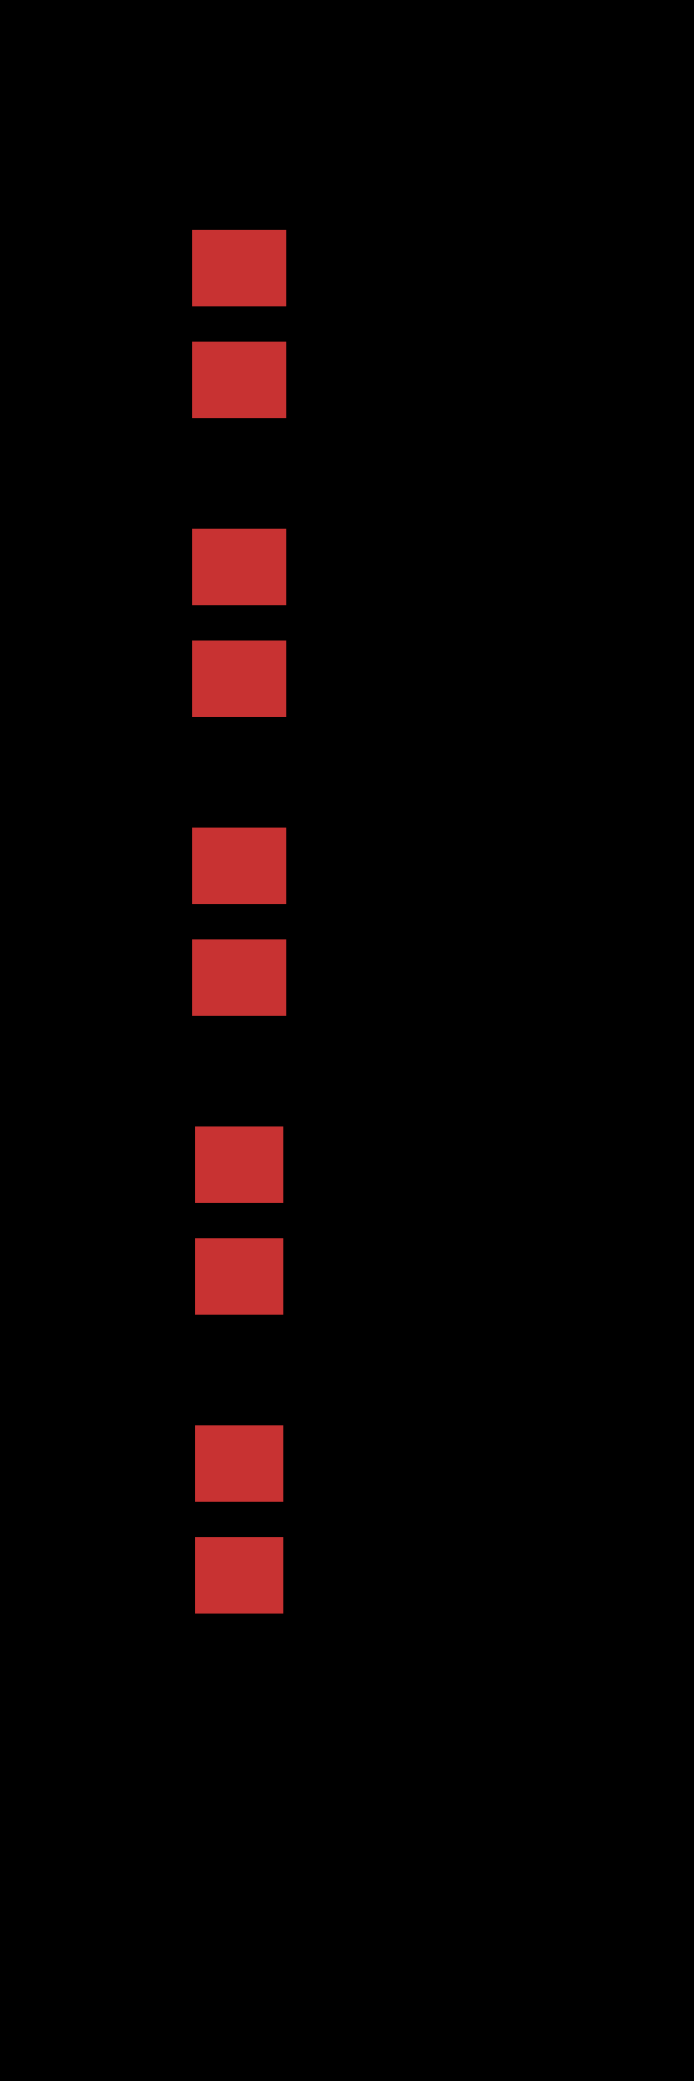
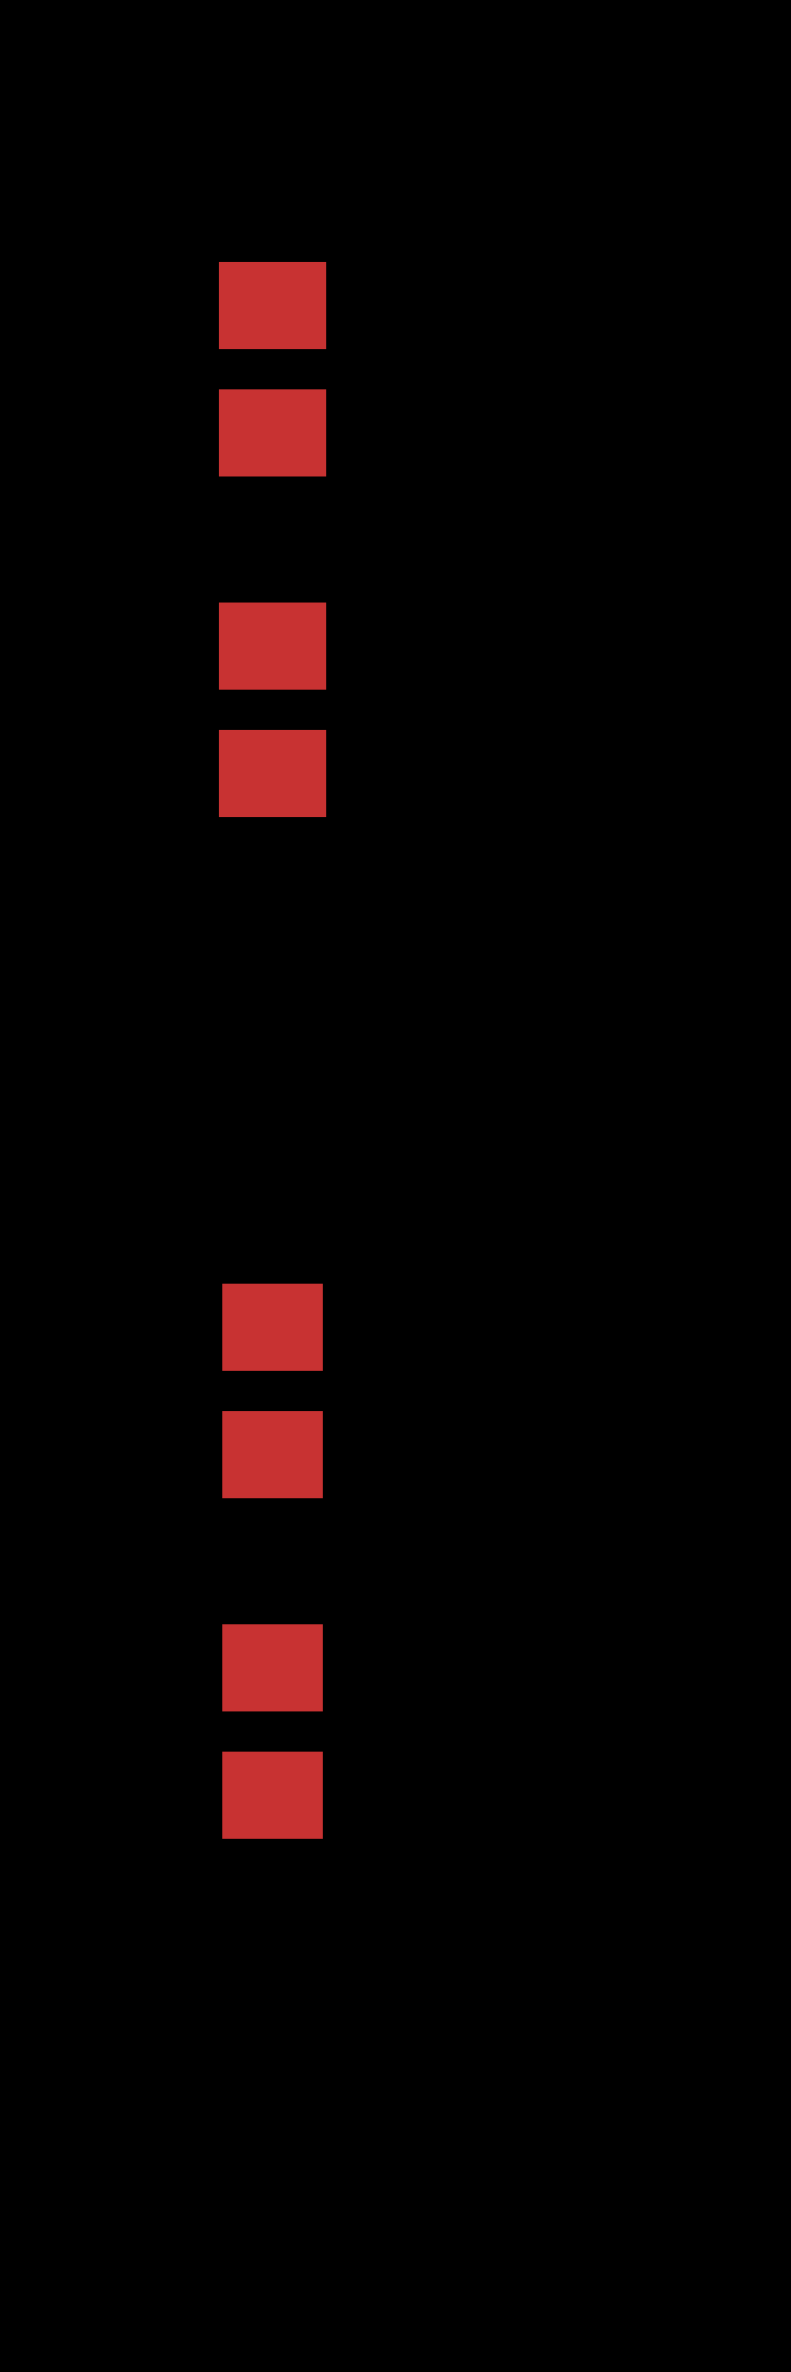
part: (239, 921) -> none

